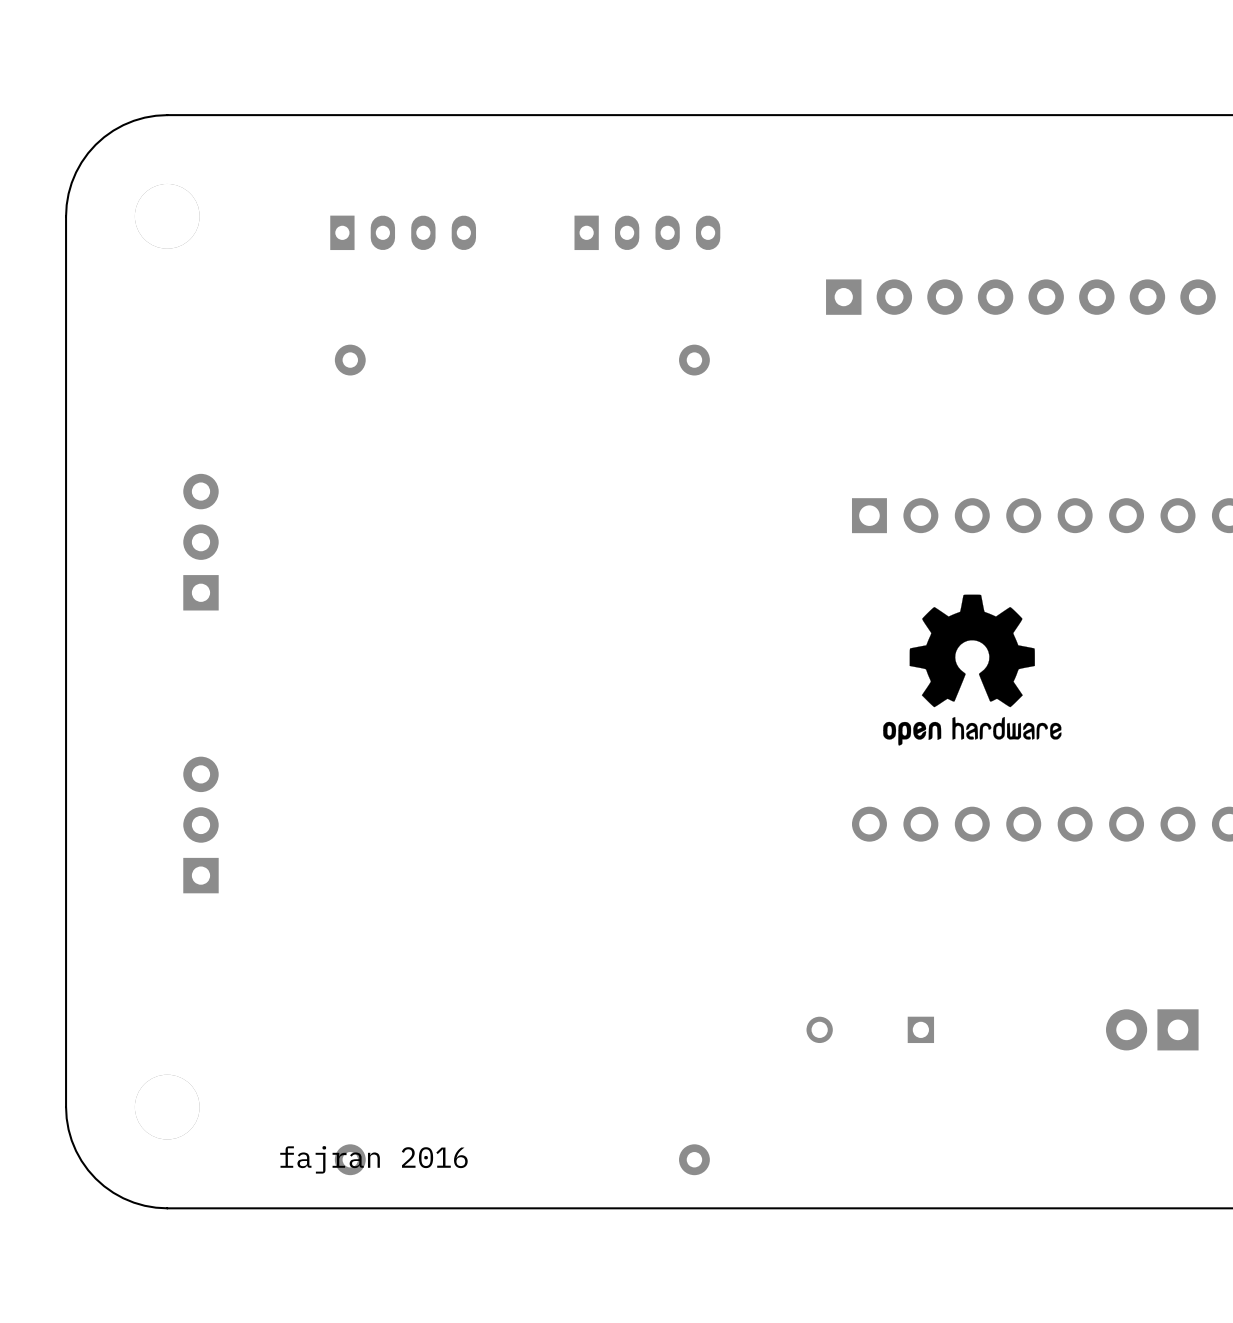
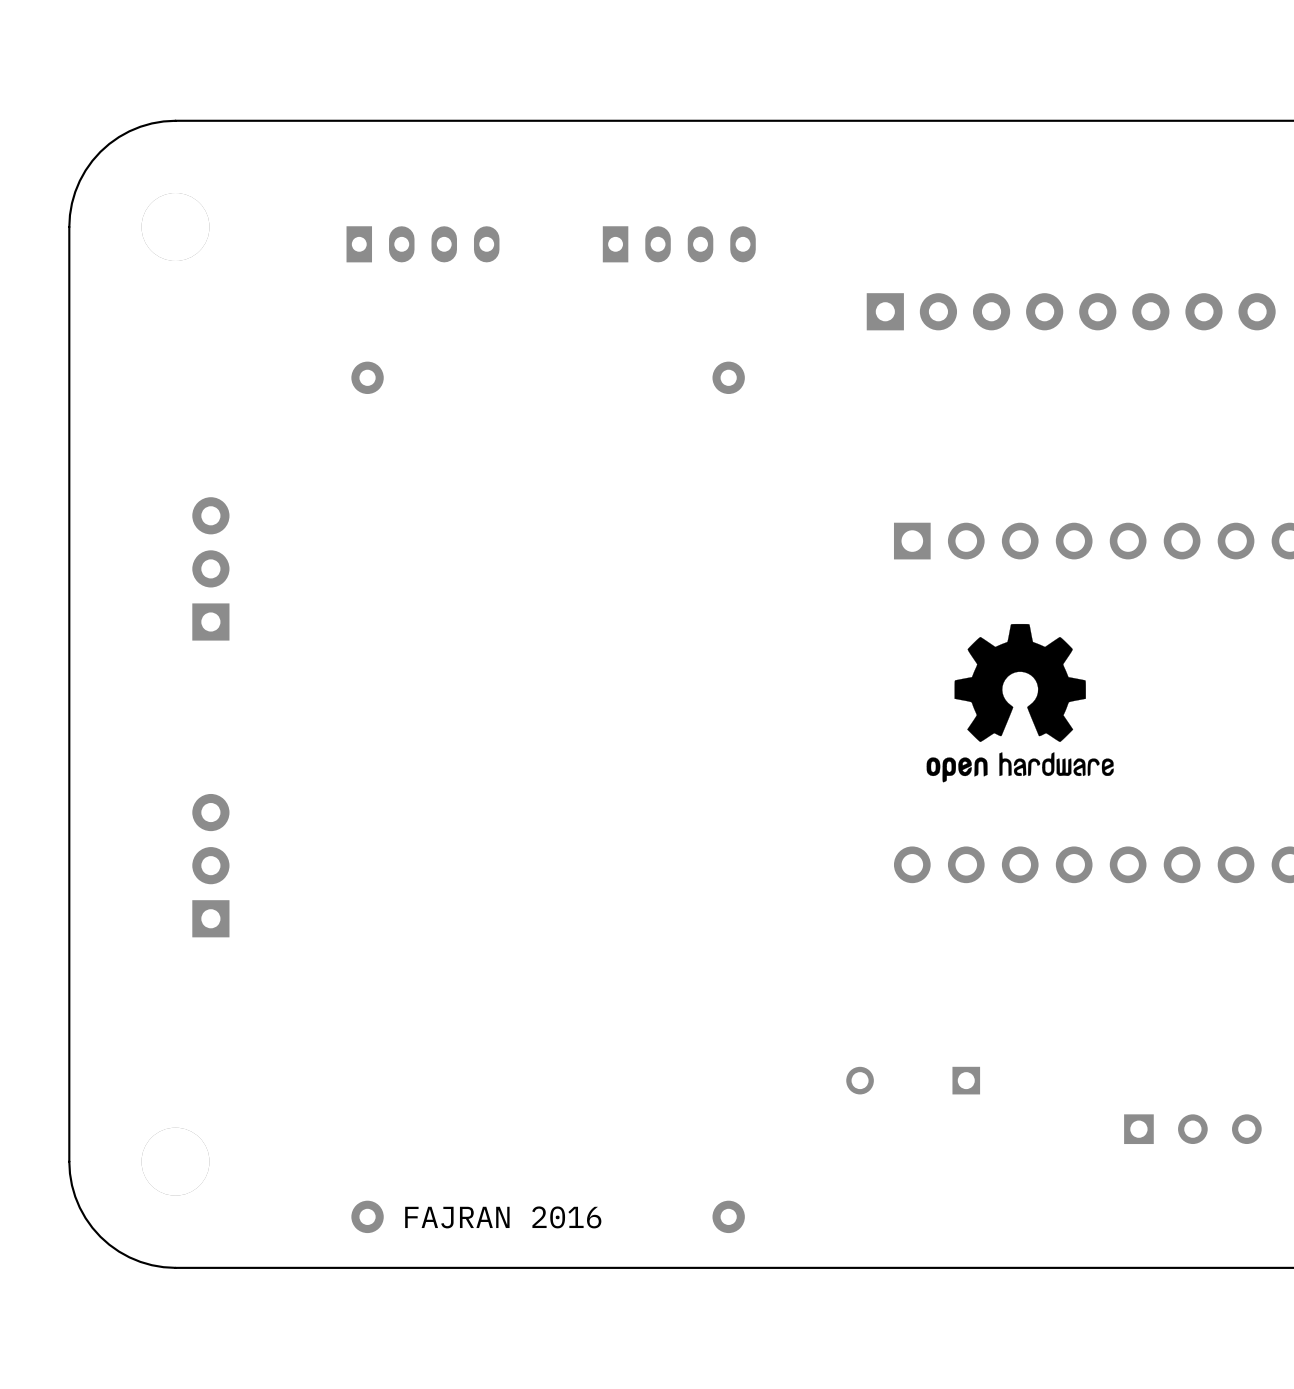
part: (1152, 1029) -> none
part: none -> (1192, 1129)
text: fajran 2016 (373, 1159) -> none
text: none -> FAJRAN 2016 (503, 1217)

